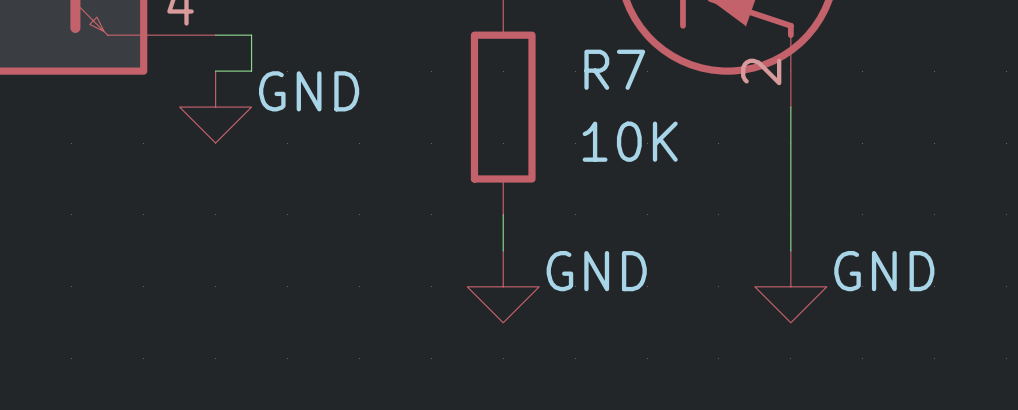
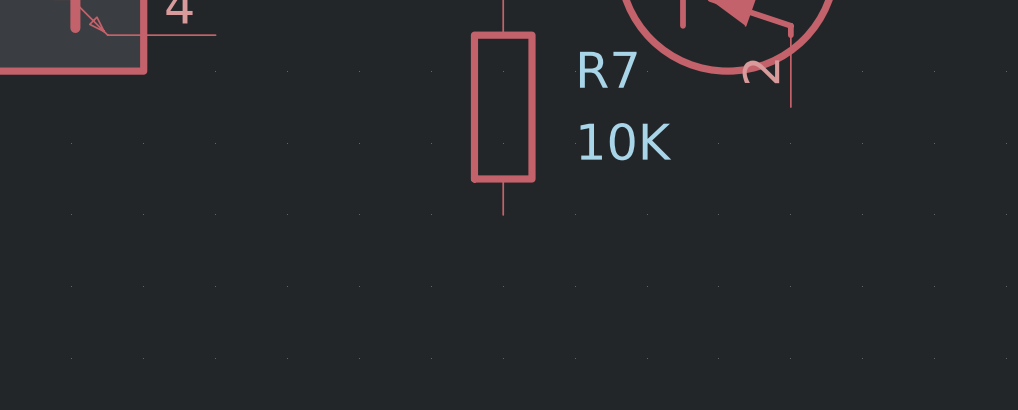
wire: (215, 35) (251, 35) (251, 71) (215, 71) -> none
power symbol: GND (215, 107) -> none
wire: (790, 107) (790, 250) -> none
wire: (503, 214) (503, 250) -> none
power symbol: GND (503, 286) -> none
power symbol: GND (790, 286) -> none

